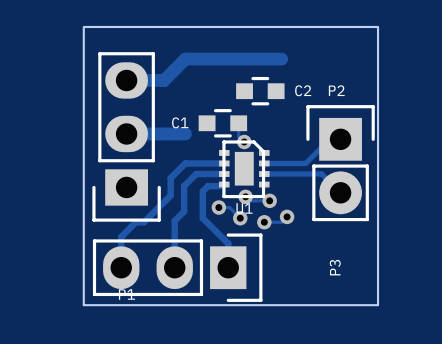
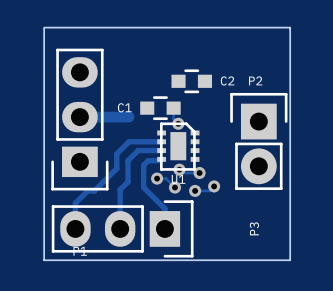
track: (281, 59) (185, 59) (164, 80) (126, 80) -> none
track: (340, 139) (329, 139) (305, 163) (264, 163) -> none
track: (264, 174) (321, 174) (340, 192) -> none

